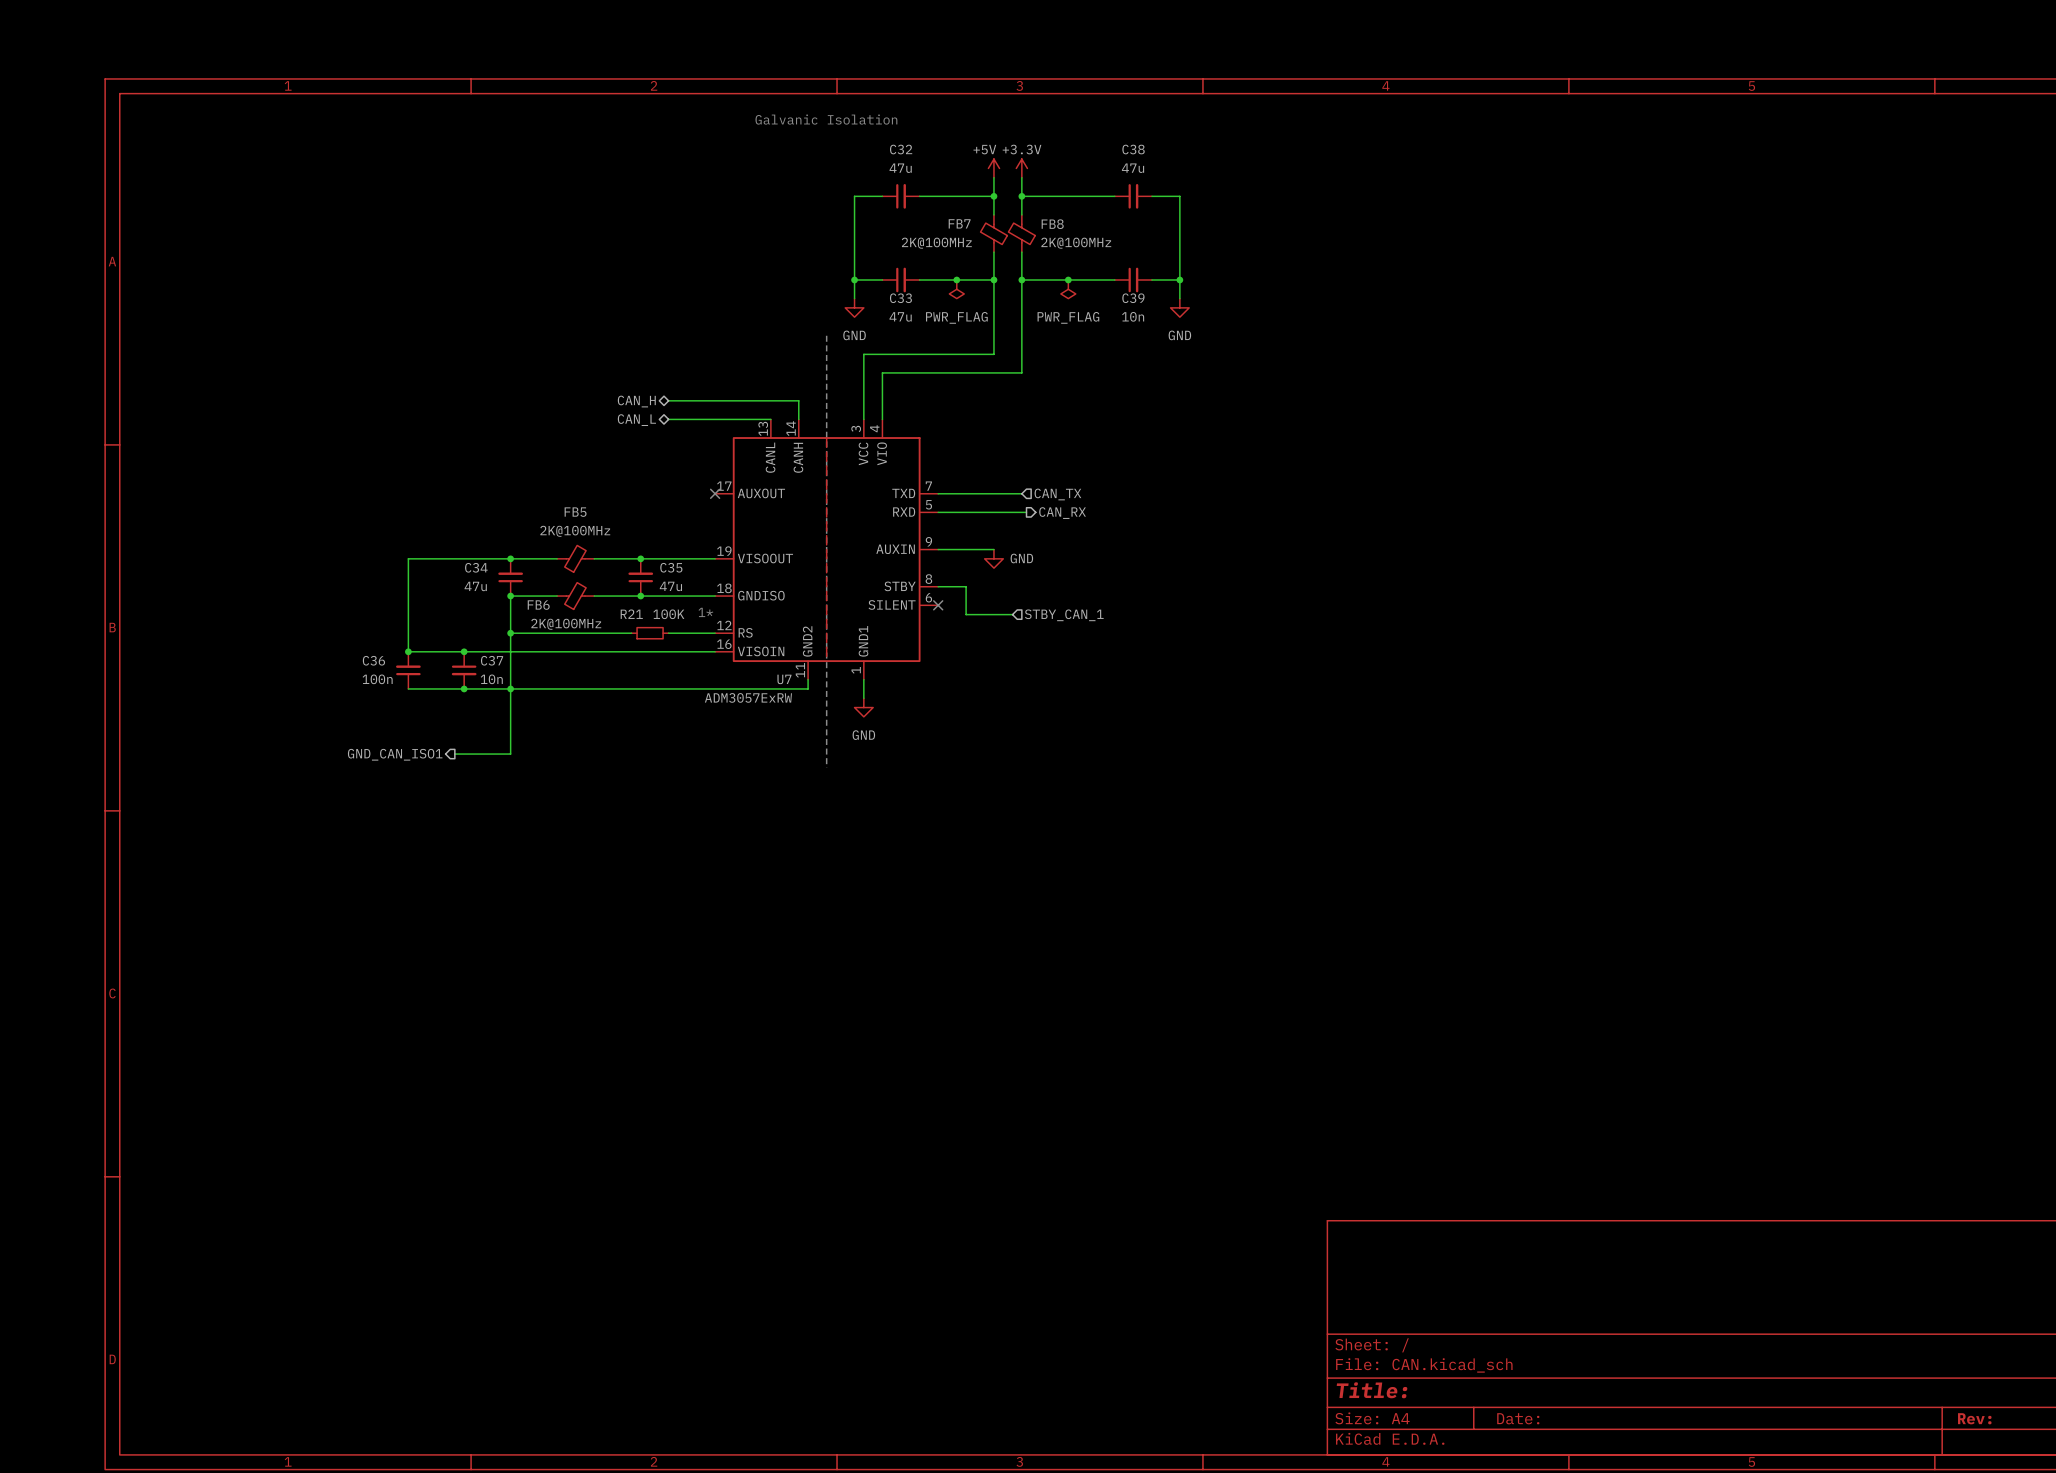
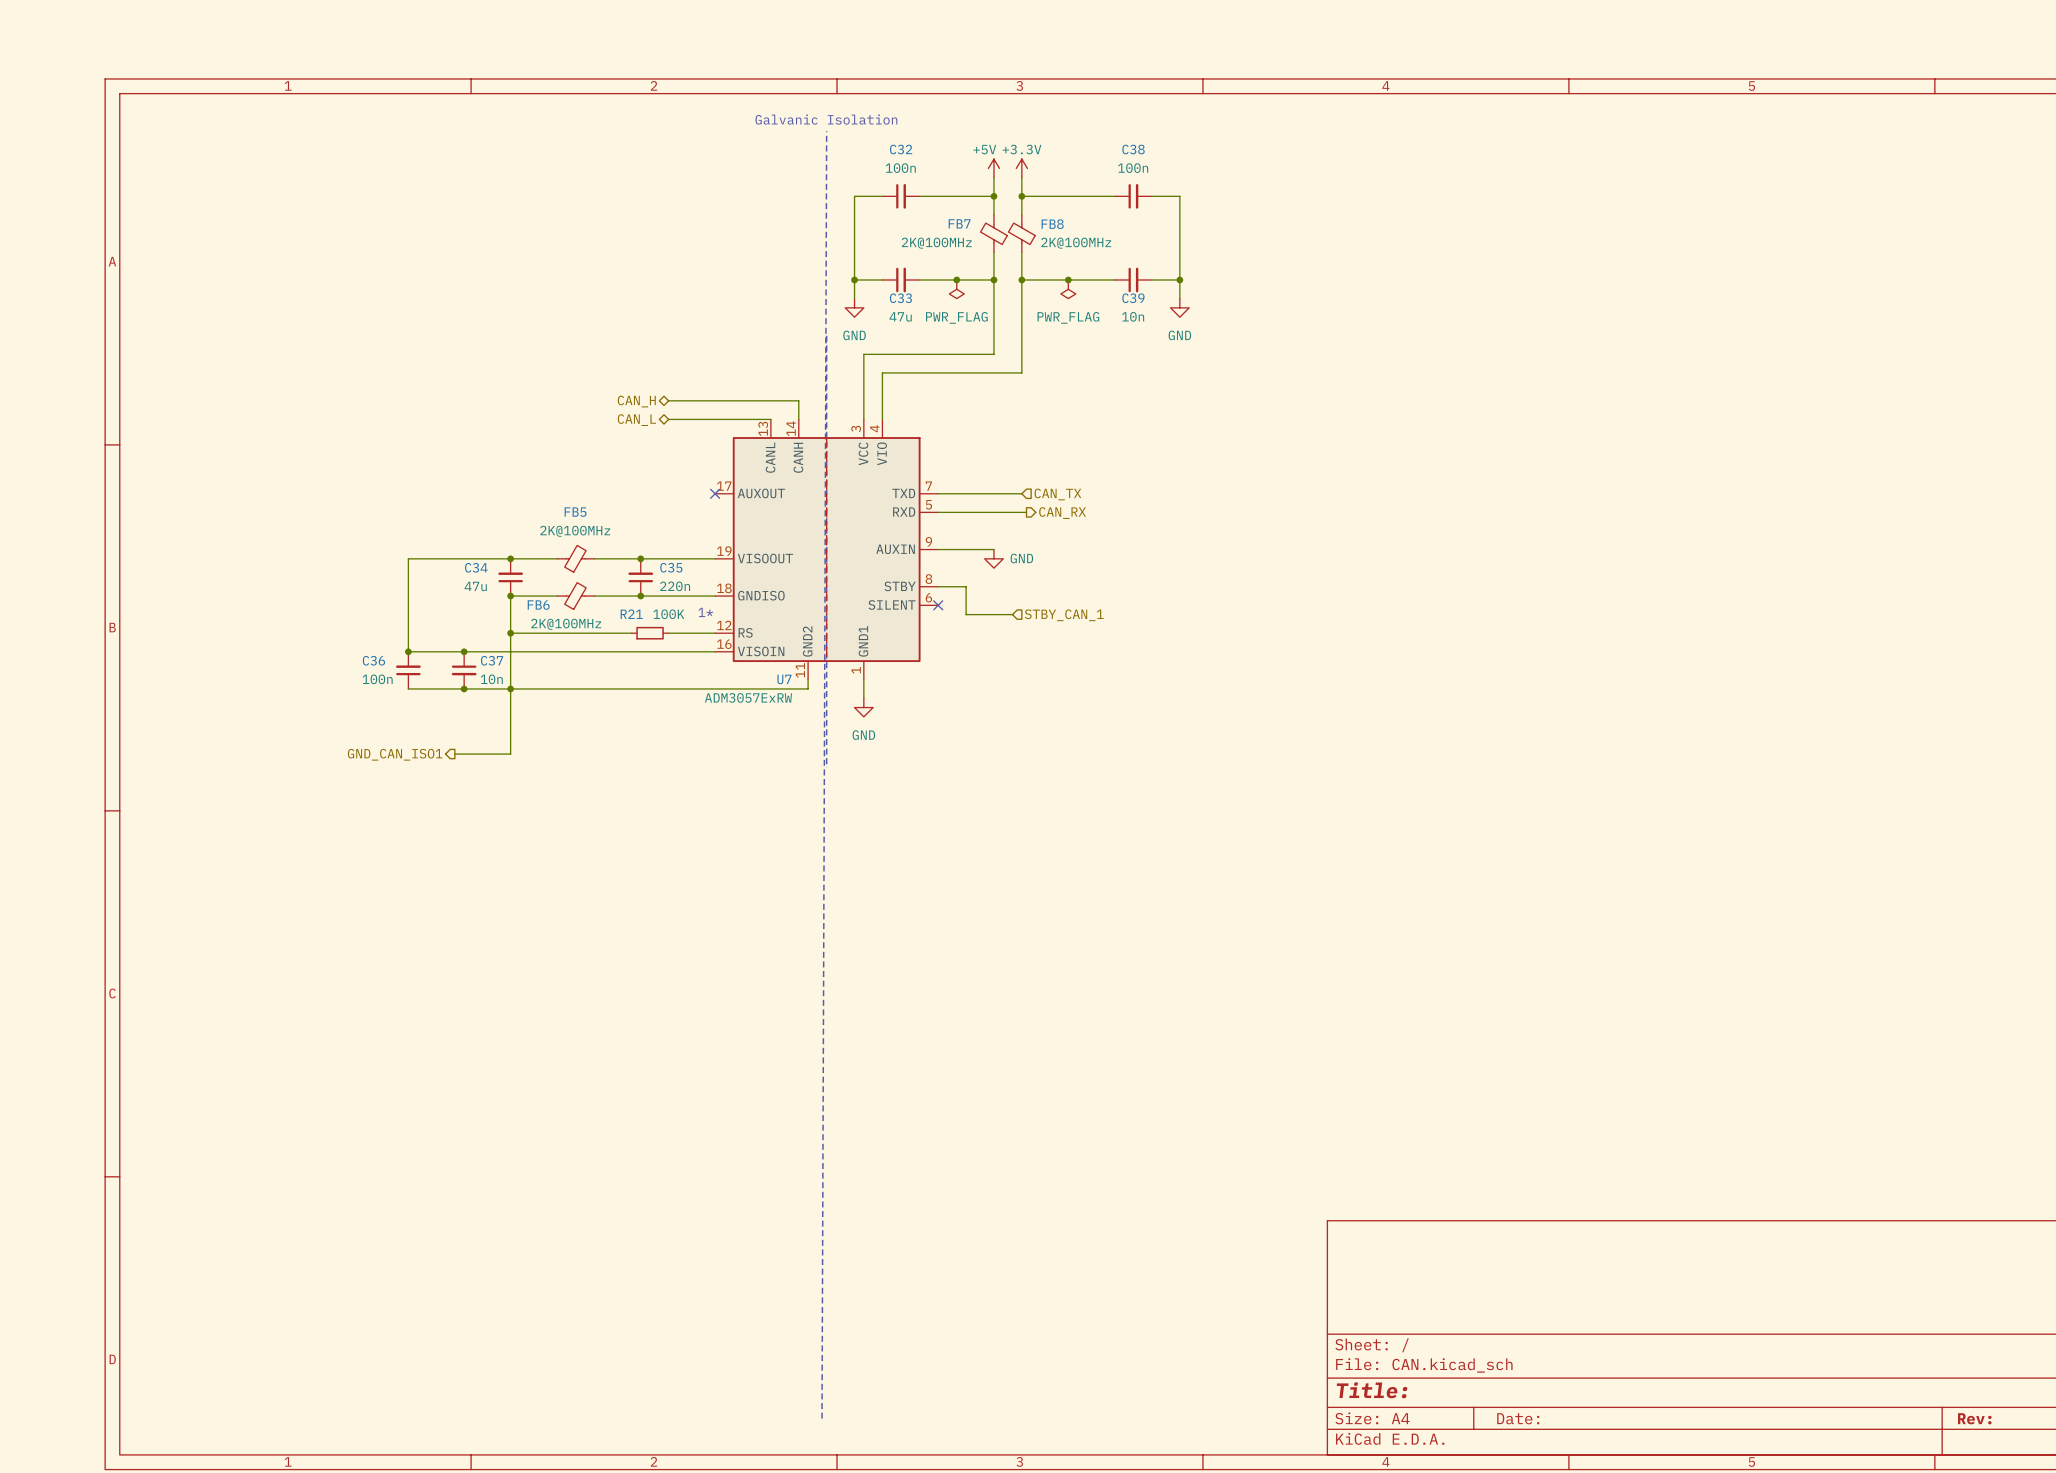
line: none -> (826, 131) (822, 1418)
C32 value: 47u (900, 168) -> 100n (900, 168)
C38 value: 47u (1133, 168) -> 100n (1133, 168)
C35 value: 47u (670, 586) -> 220n (675, 586)

